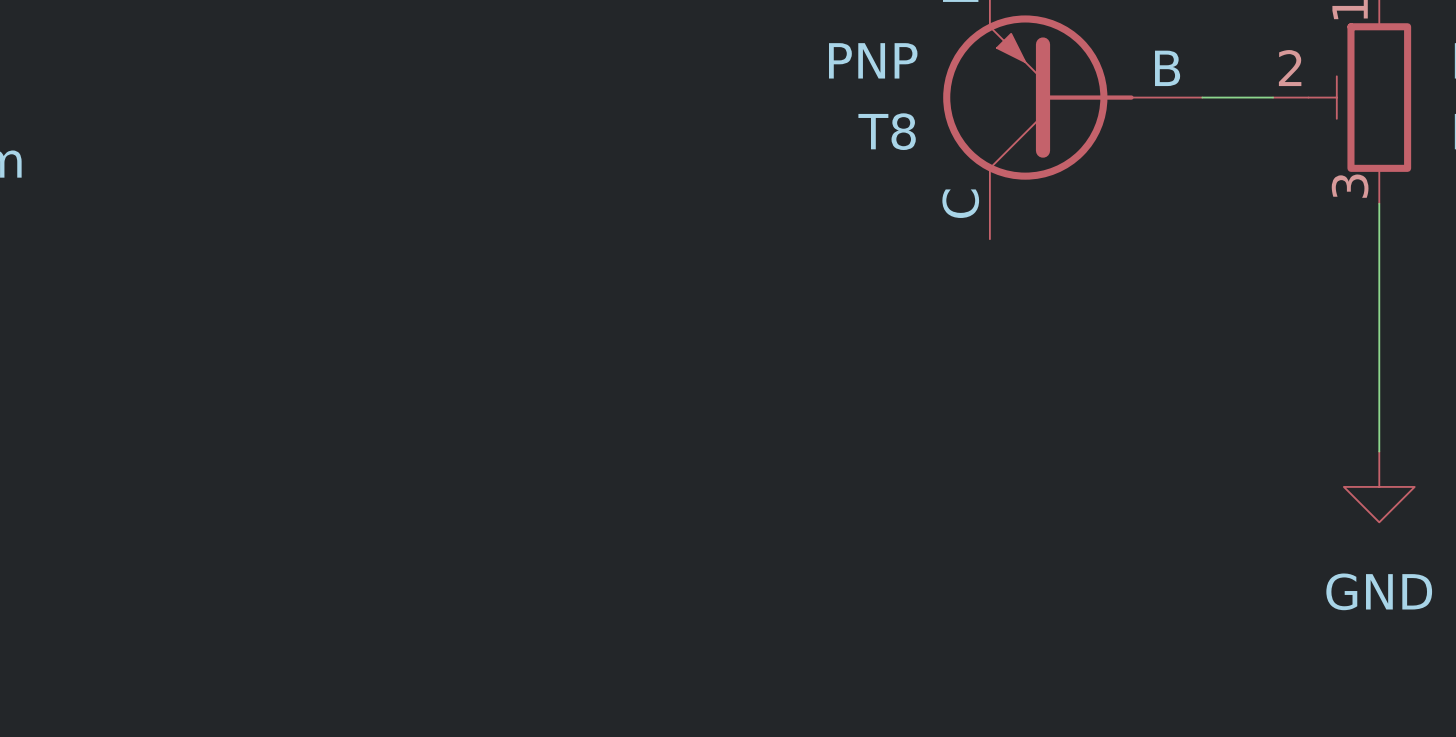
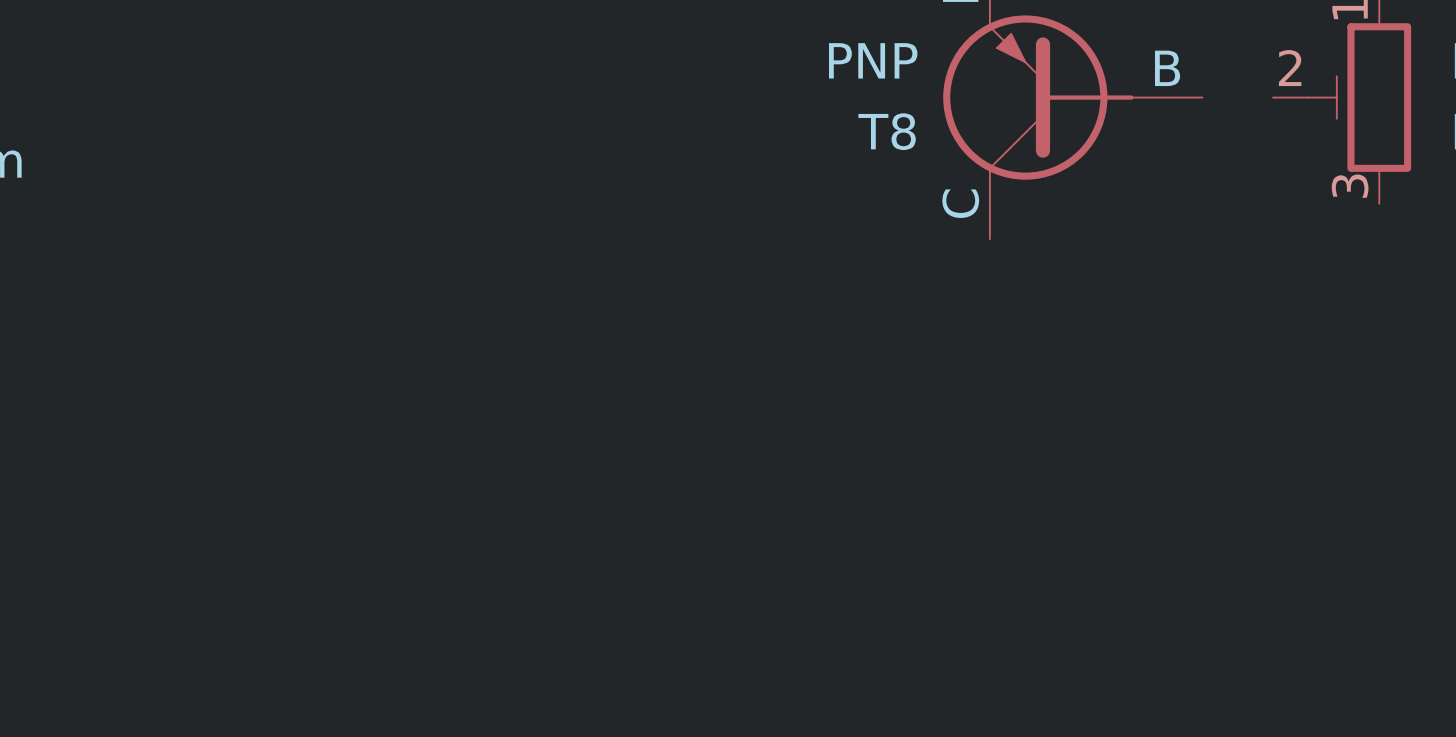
wire: (1202, 97) (1273, 97) -> none
wire: (1379, 203) (1379, 451) -> none
power symbol: GND (1379, 486) -> none

